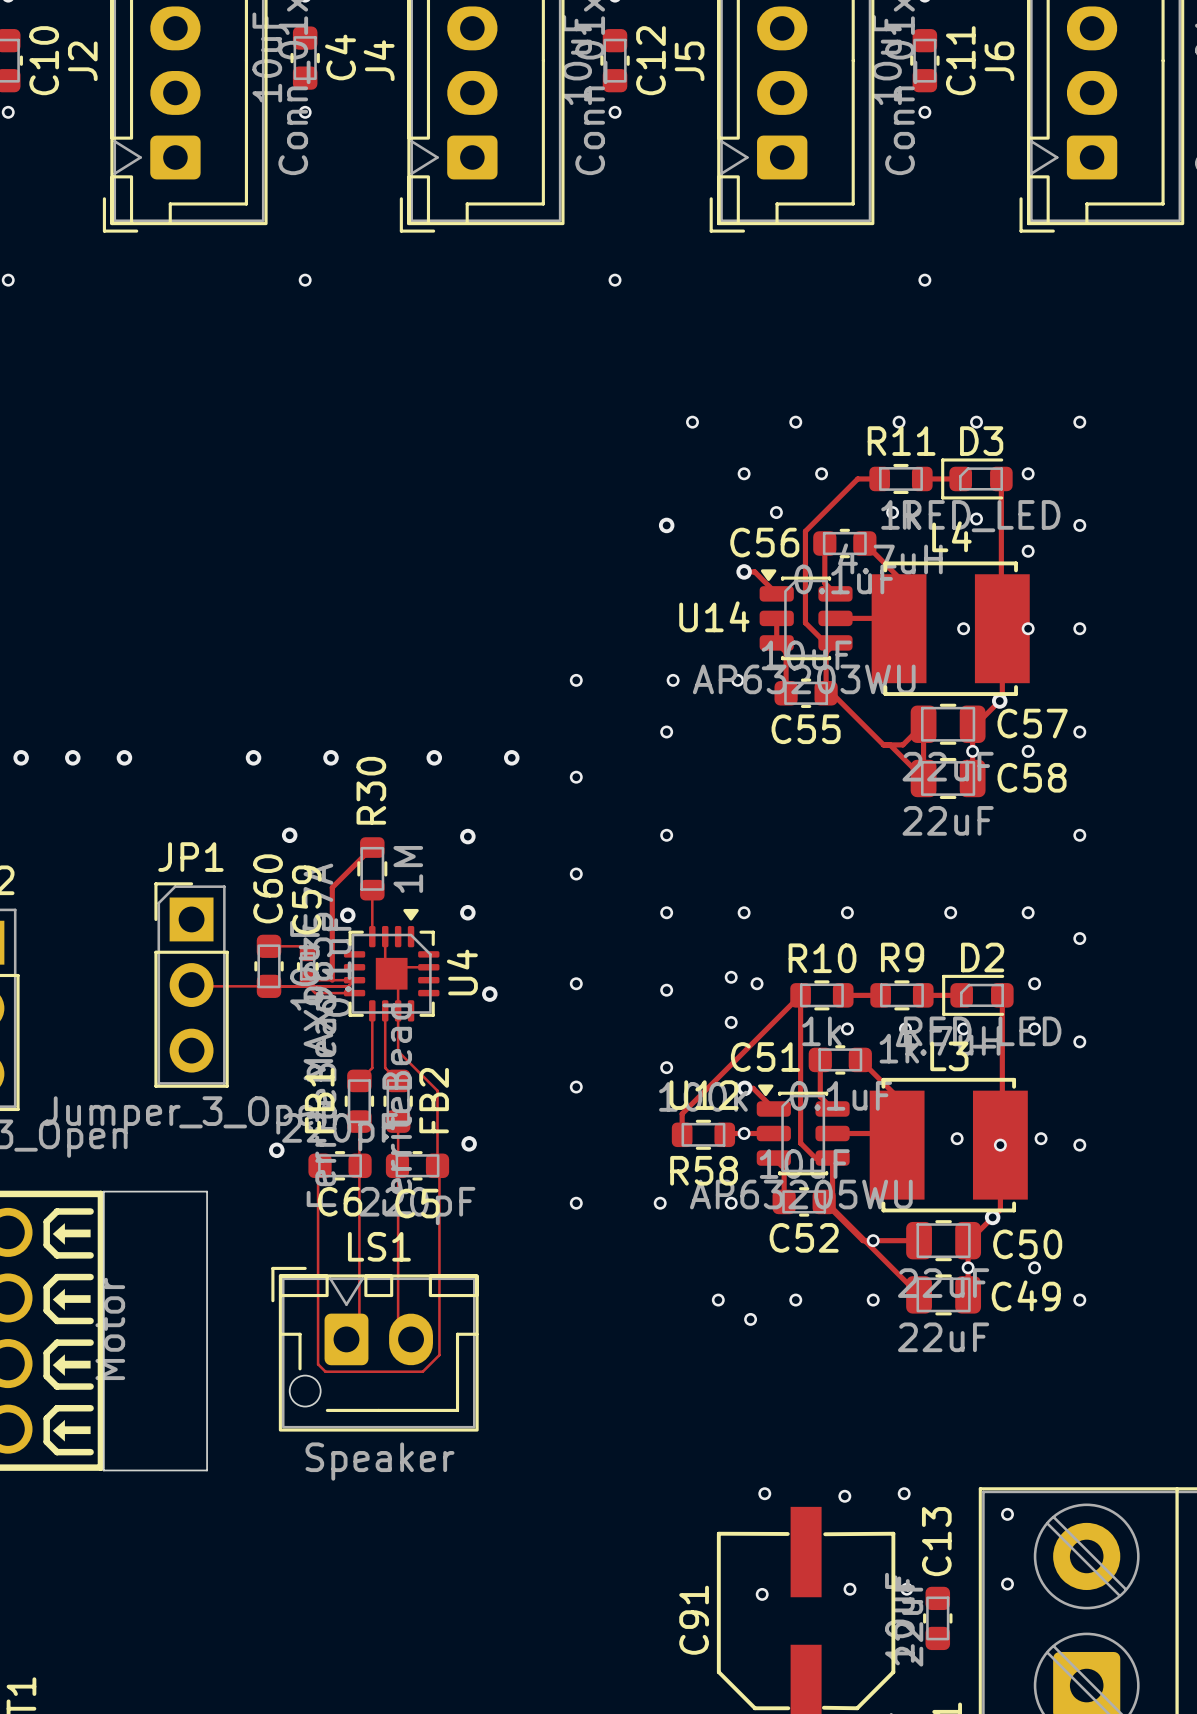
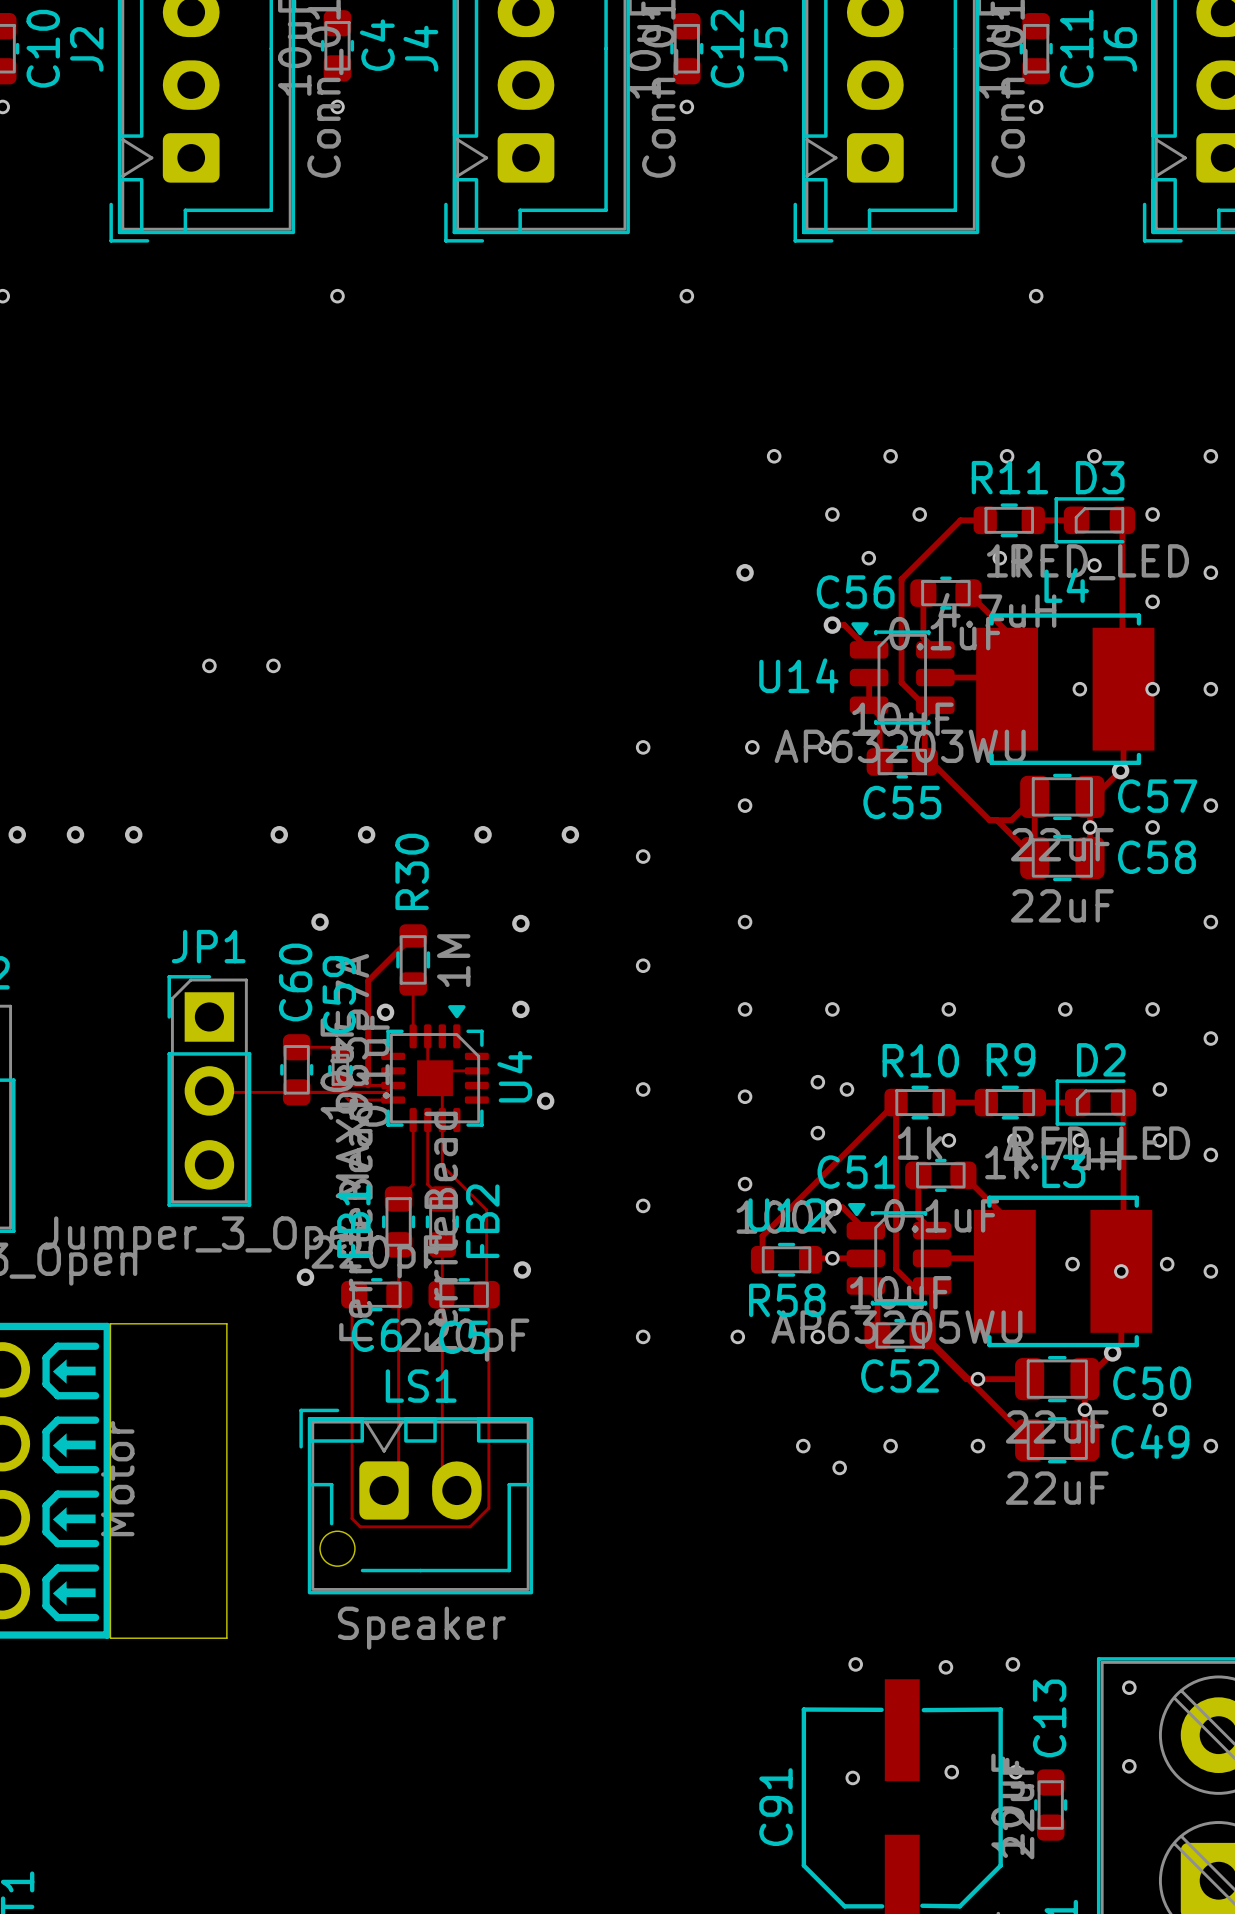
via: none -> (209, 665)
via: none -> (273, 665)

